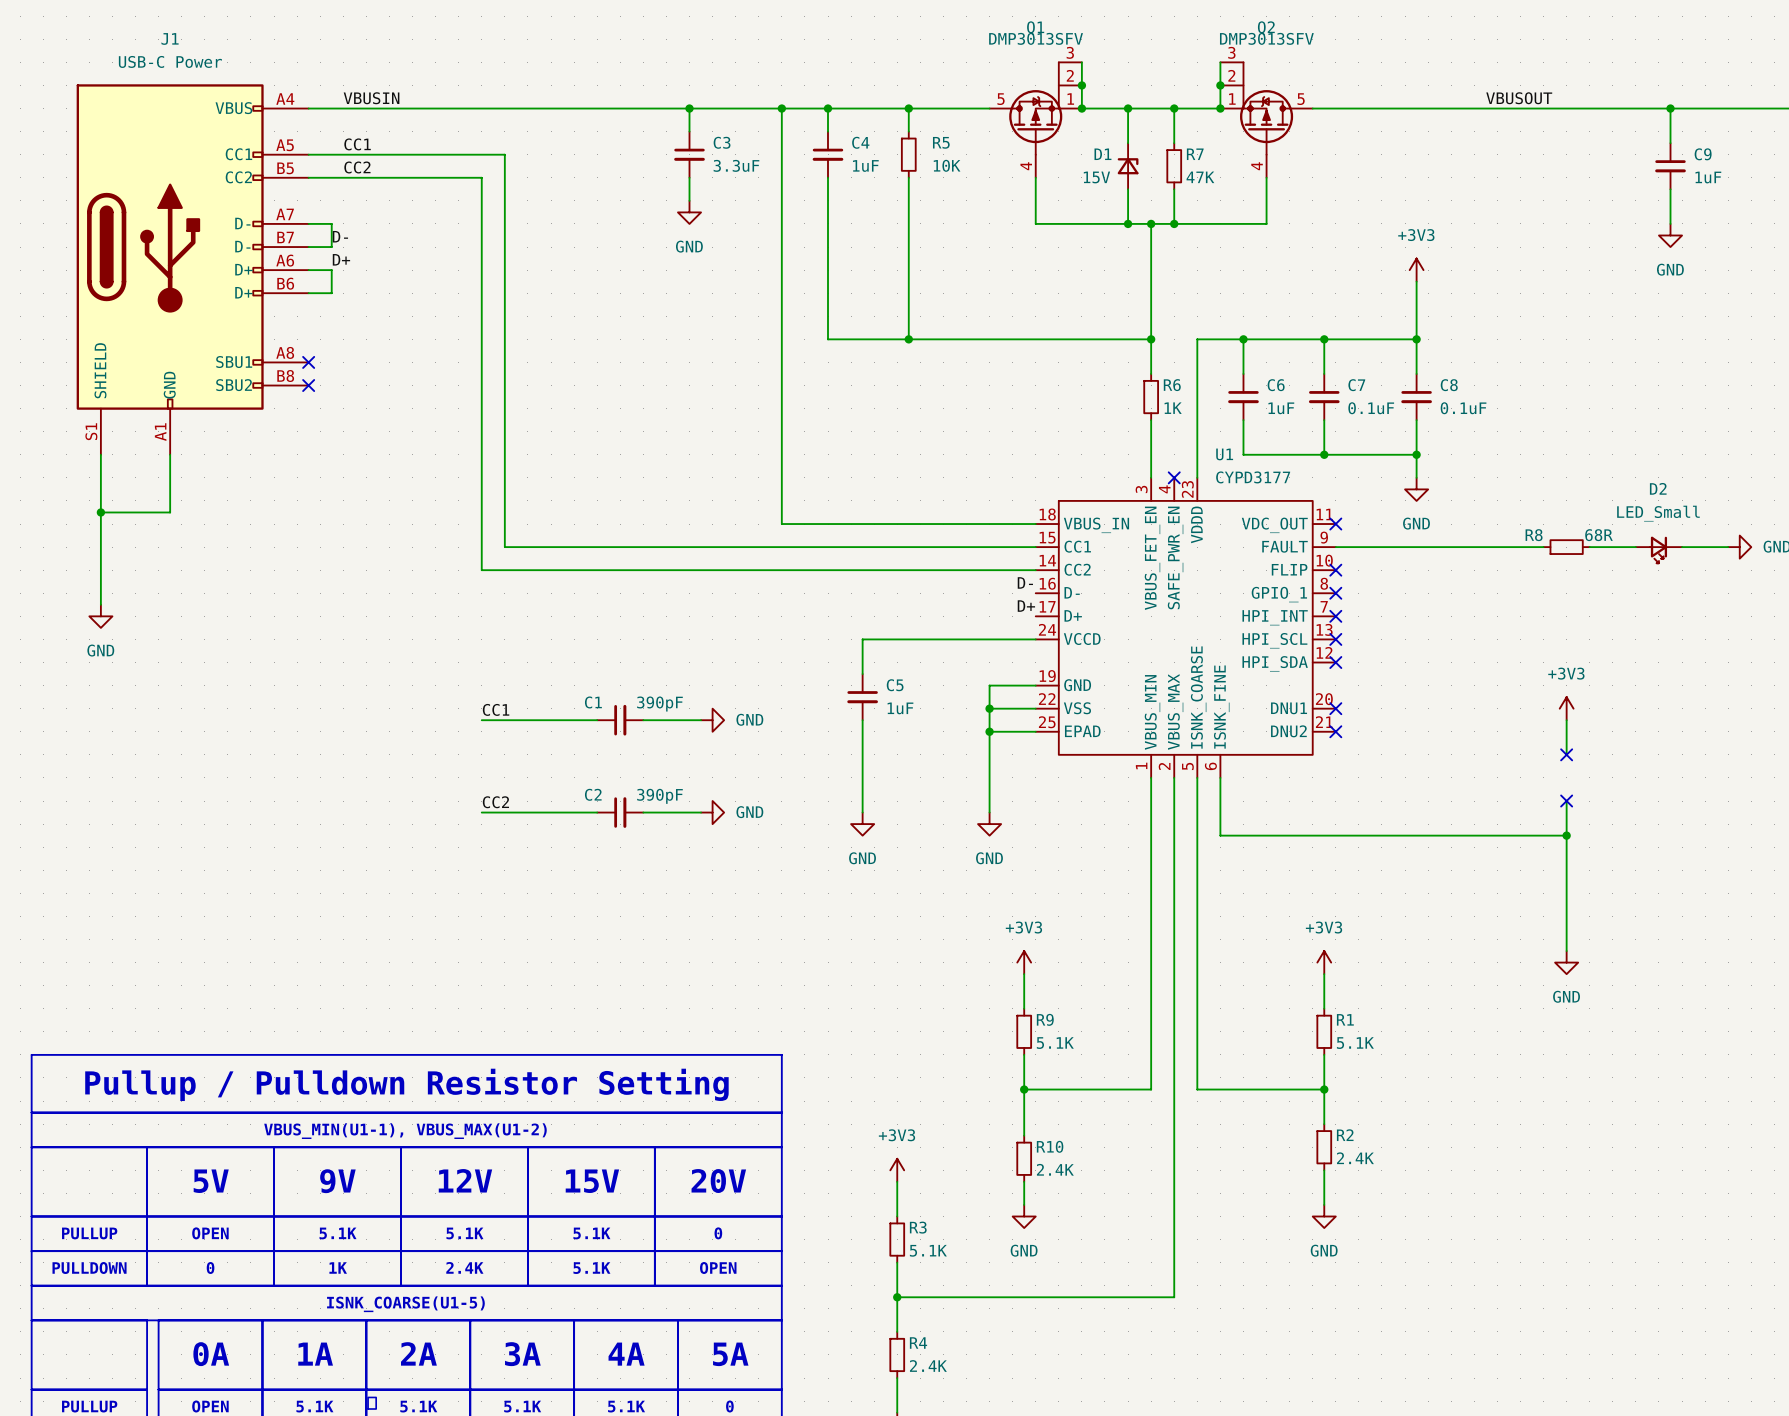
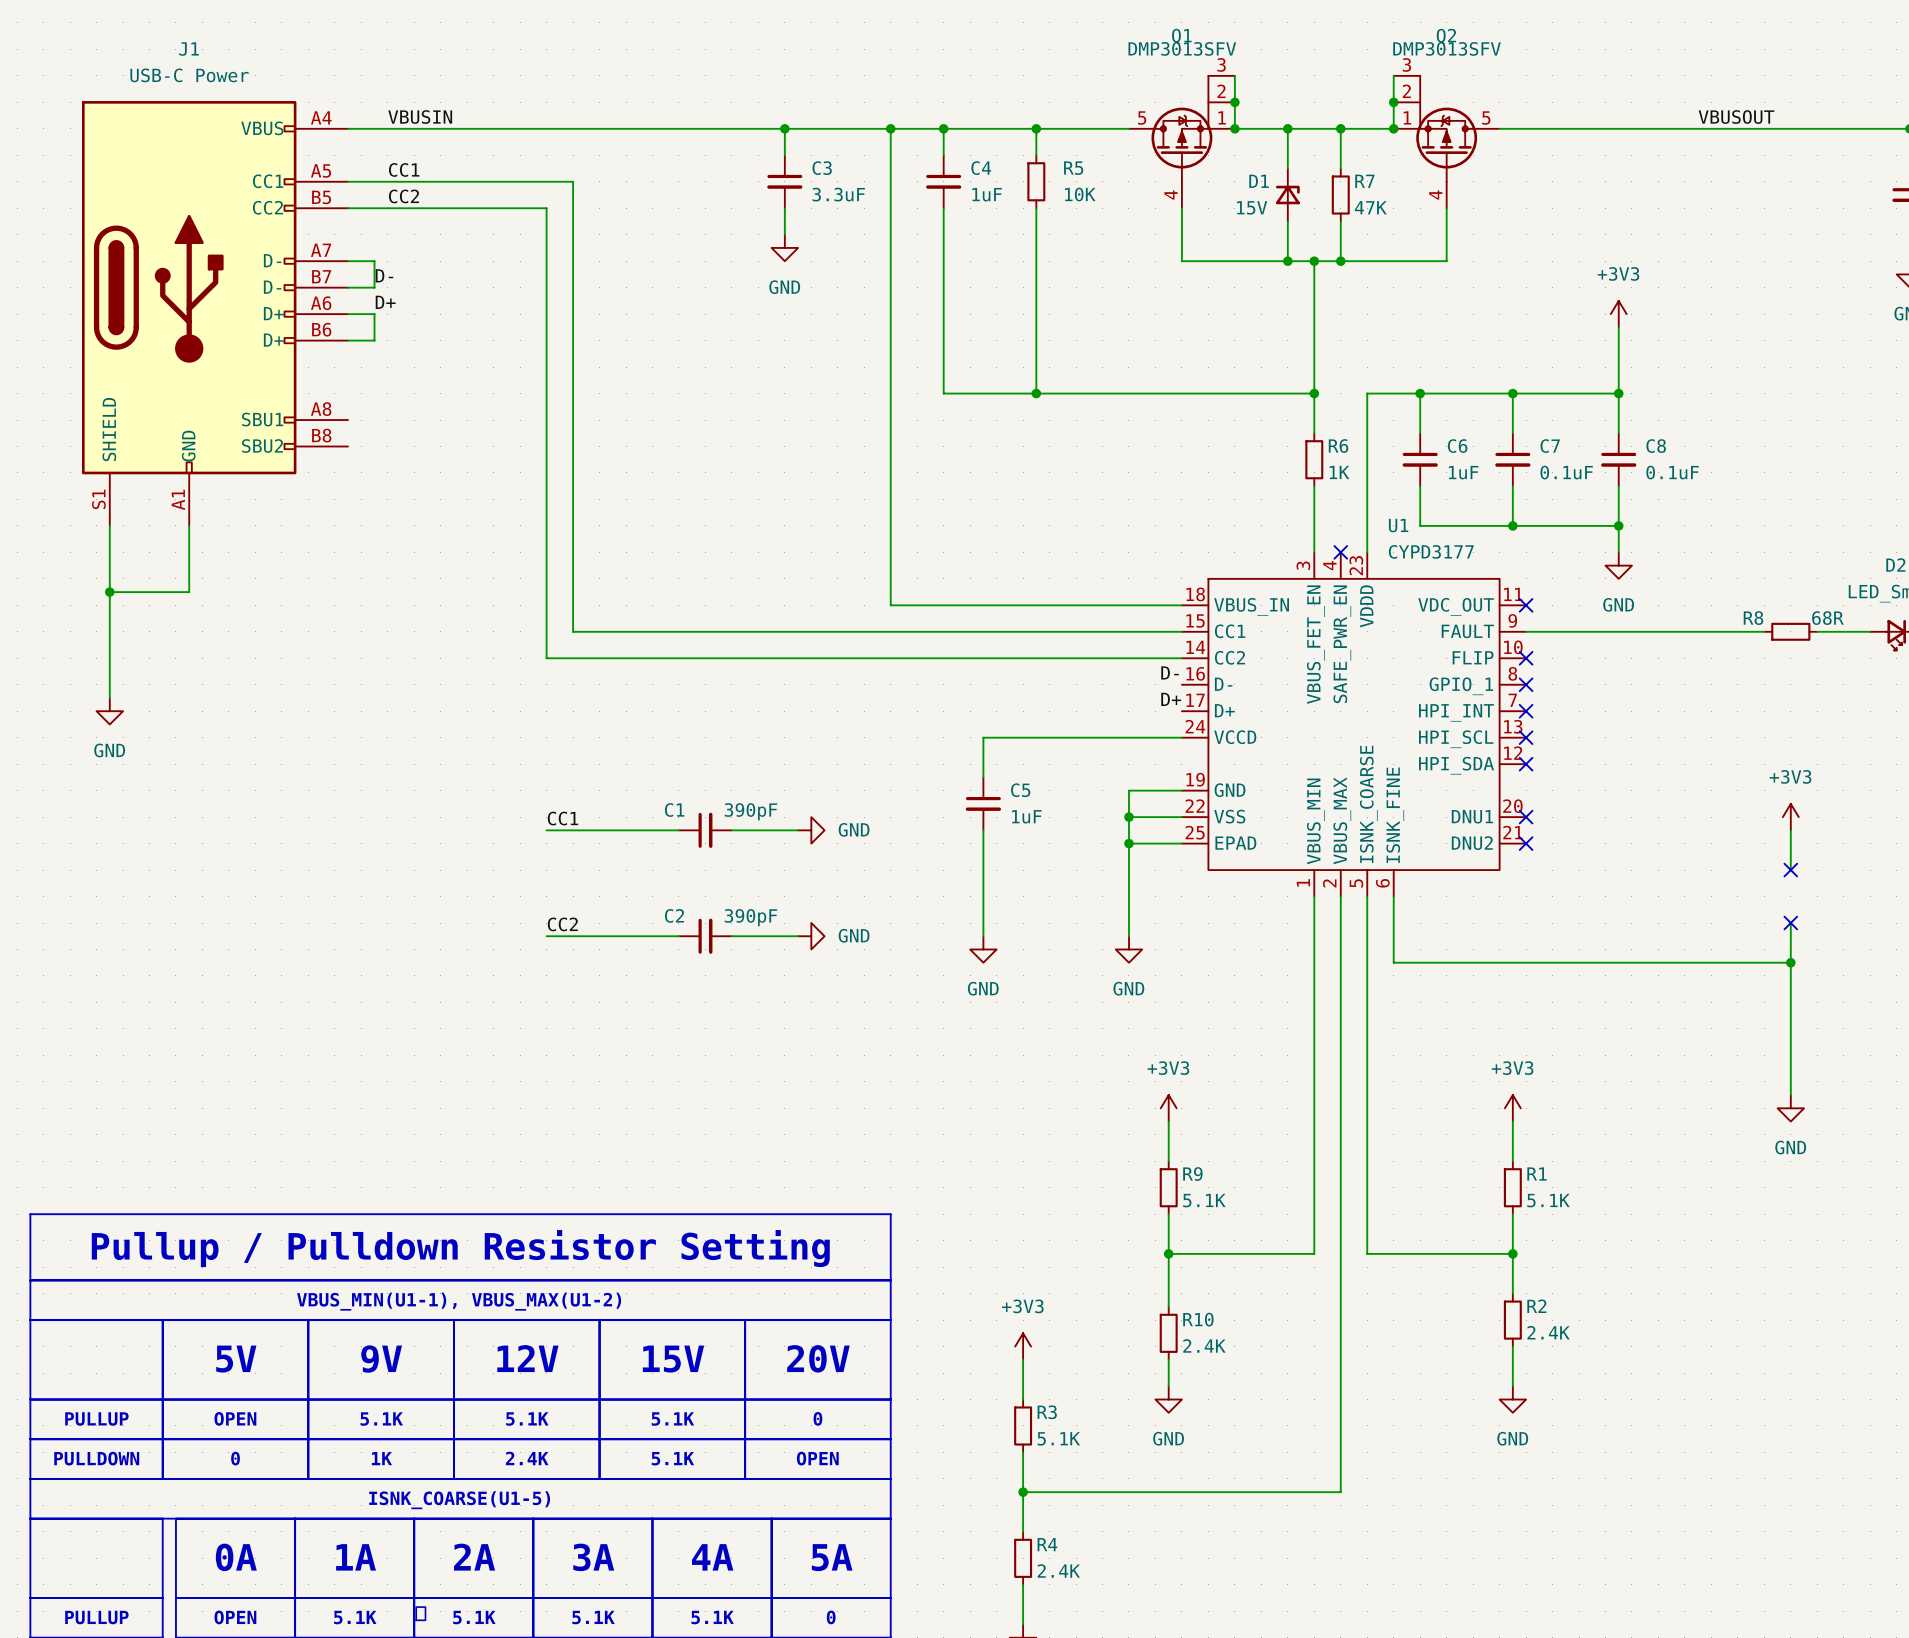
no-connect mark: (308, 362) -> none
no-connect mark: (308, 385) -> none

